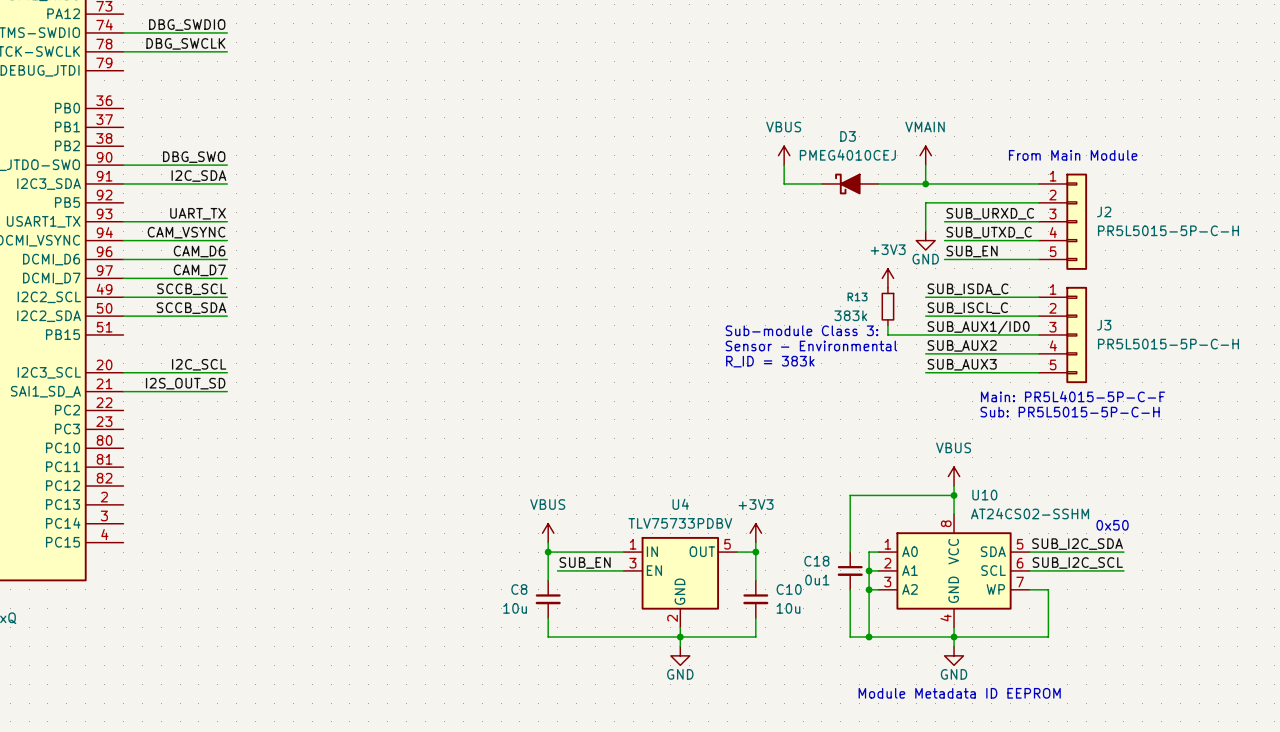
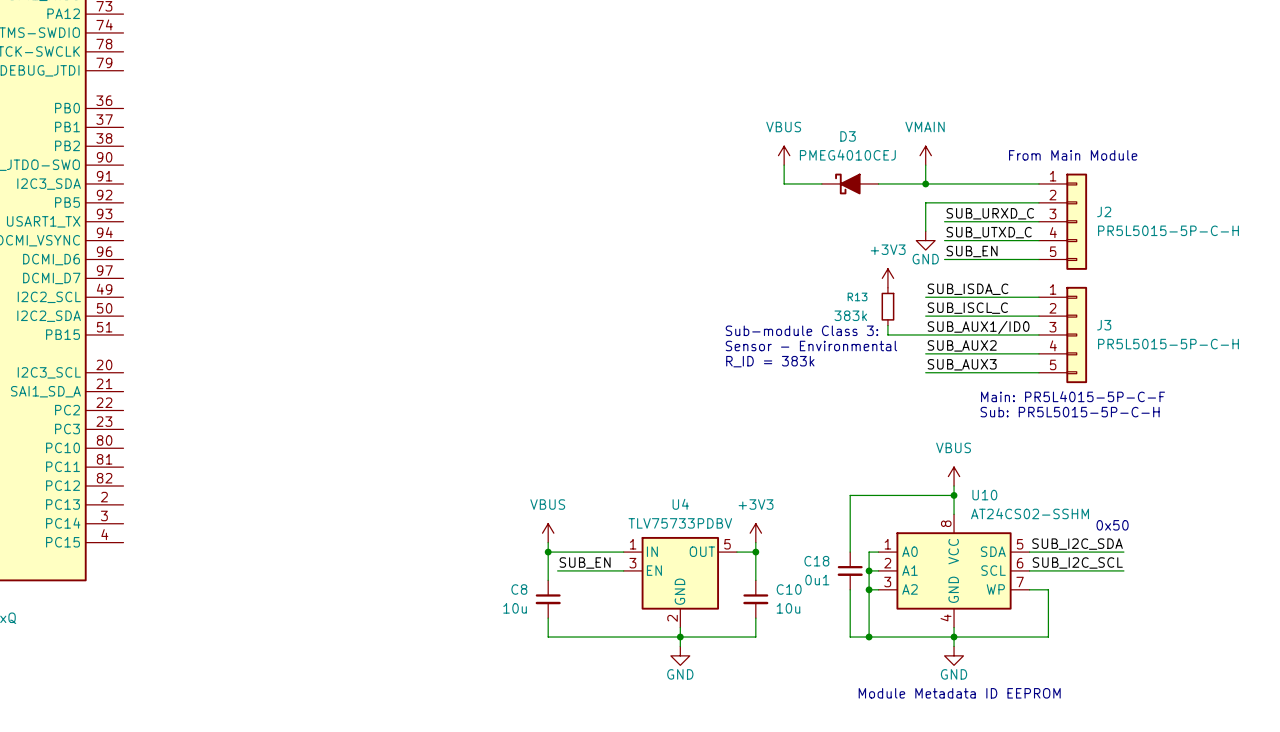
label: DBG_SWDIO (187, 25) -> none
wire: (123, 32) (227, 32) -> none
label: DBG_SWCLK (185, 43) -> none
wire: (123, 51) (227, 51) -> none
label: DBG_SWO (194, 157) -> none
wire: (123, 165) (227, 165) -> none
label: I2C_SDA (198, 176) -> none
wire: (123, 183) (227, 183) -> none
label: UART_TX (198, 213) -> none
wire: (123, 221) (227, 221) -> none
label: CAM_VSYNC (186, 232) -> none
wire: (123, 240) (227, 240) -> none
label: CAM_D6 (199, 251) -> none
wire: (123, 259) (227, 259) -> none
label: CAM_D7 (199, 270) -> none
wire: (123, 278) (227, 278) -> none
label: SCCB_SCL (191, 289) -> none
wire: (123, 297) (227, 297) -> none
label: SCCB_SDA (191, 308) -> none
wire: (123, 316) (227, 316) -> none
label: I2C_SCL (199, 364) -> none
wire: (123, 372) (227, 372) -> none
label: I2S_OUT_SD (185, 383) -> none
wire: (123, 391) (227, 391) -> none

